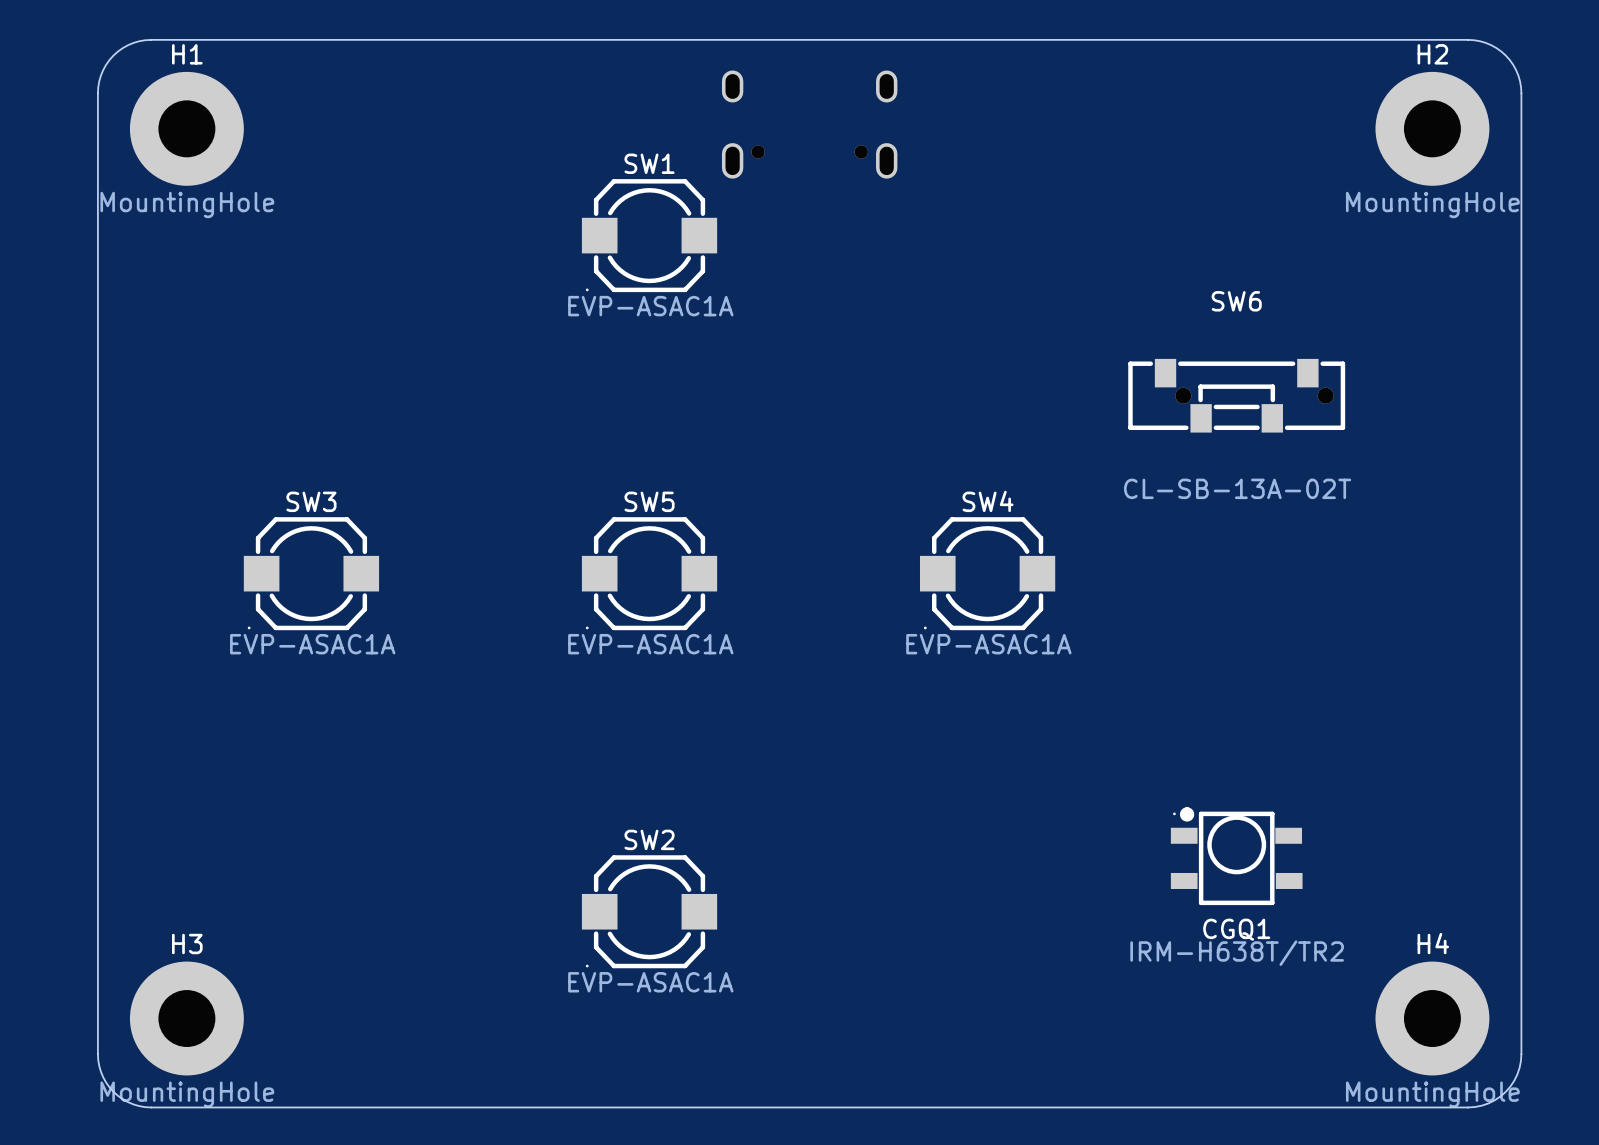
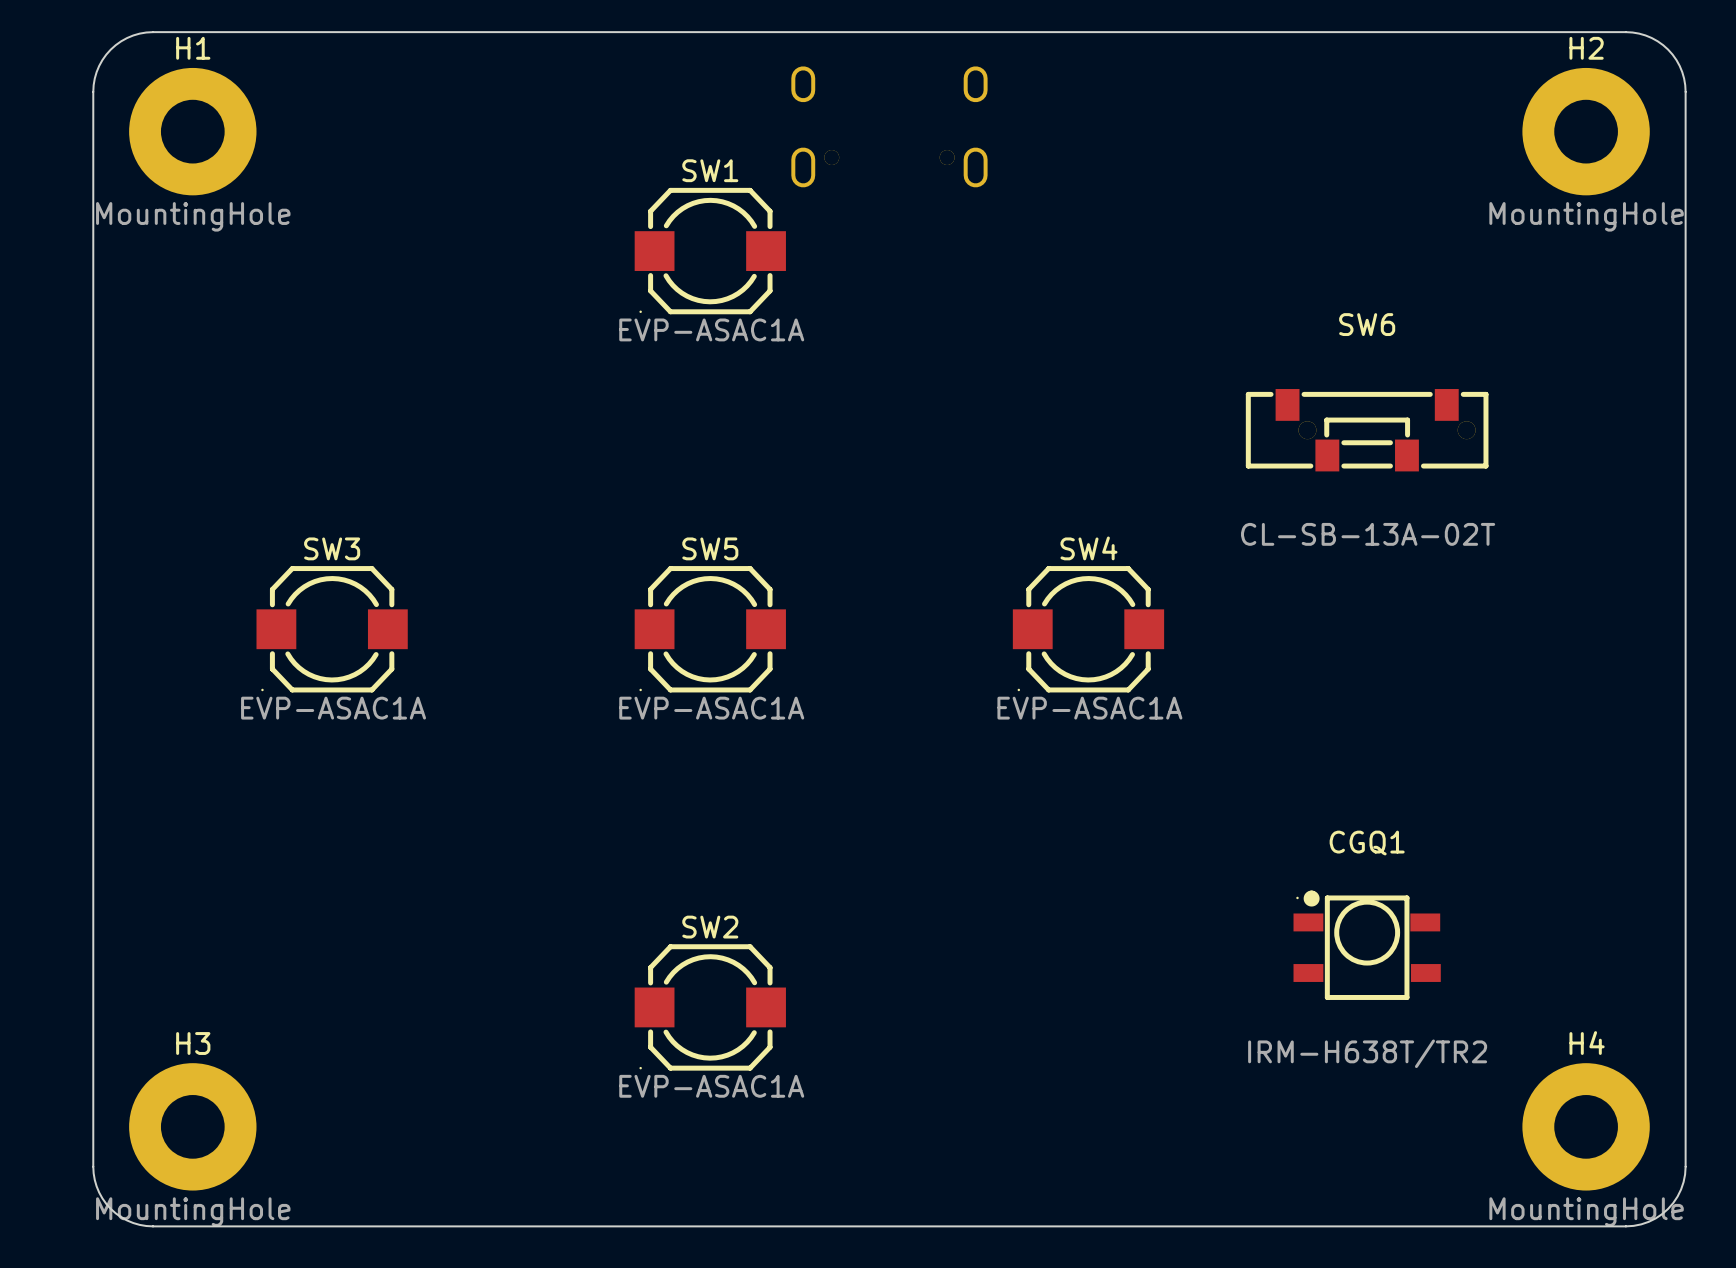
CGQ1 name position: CGQ1 (1236, 929) -> CGQ1 (1367, 843)

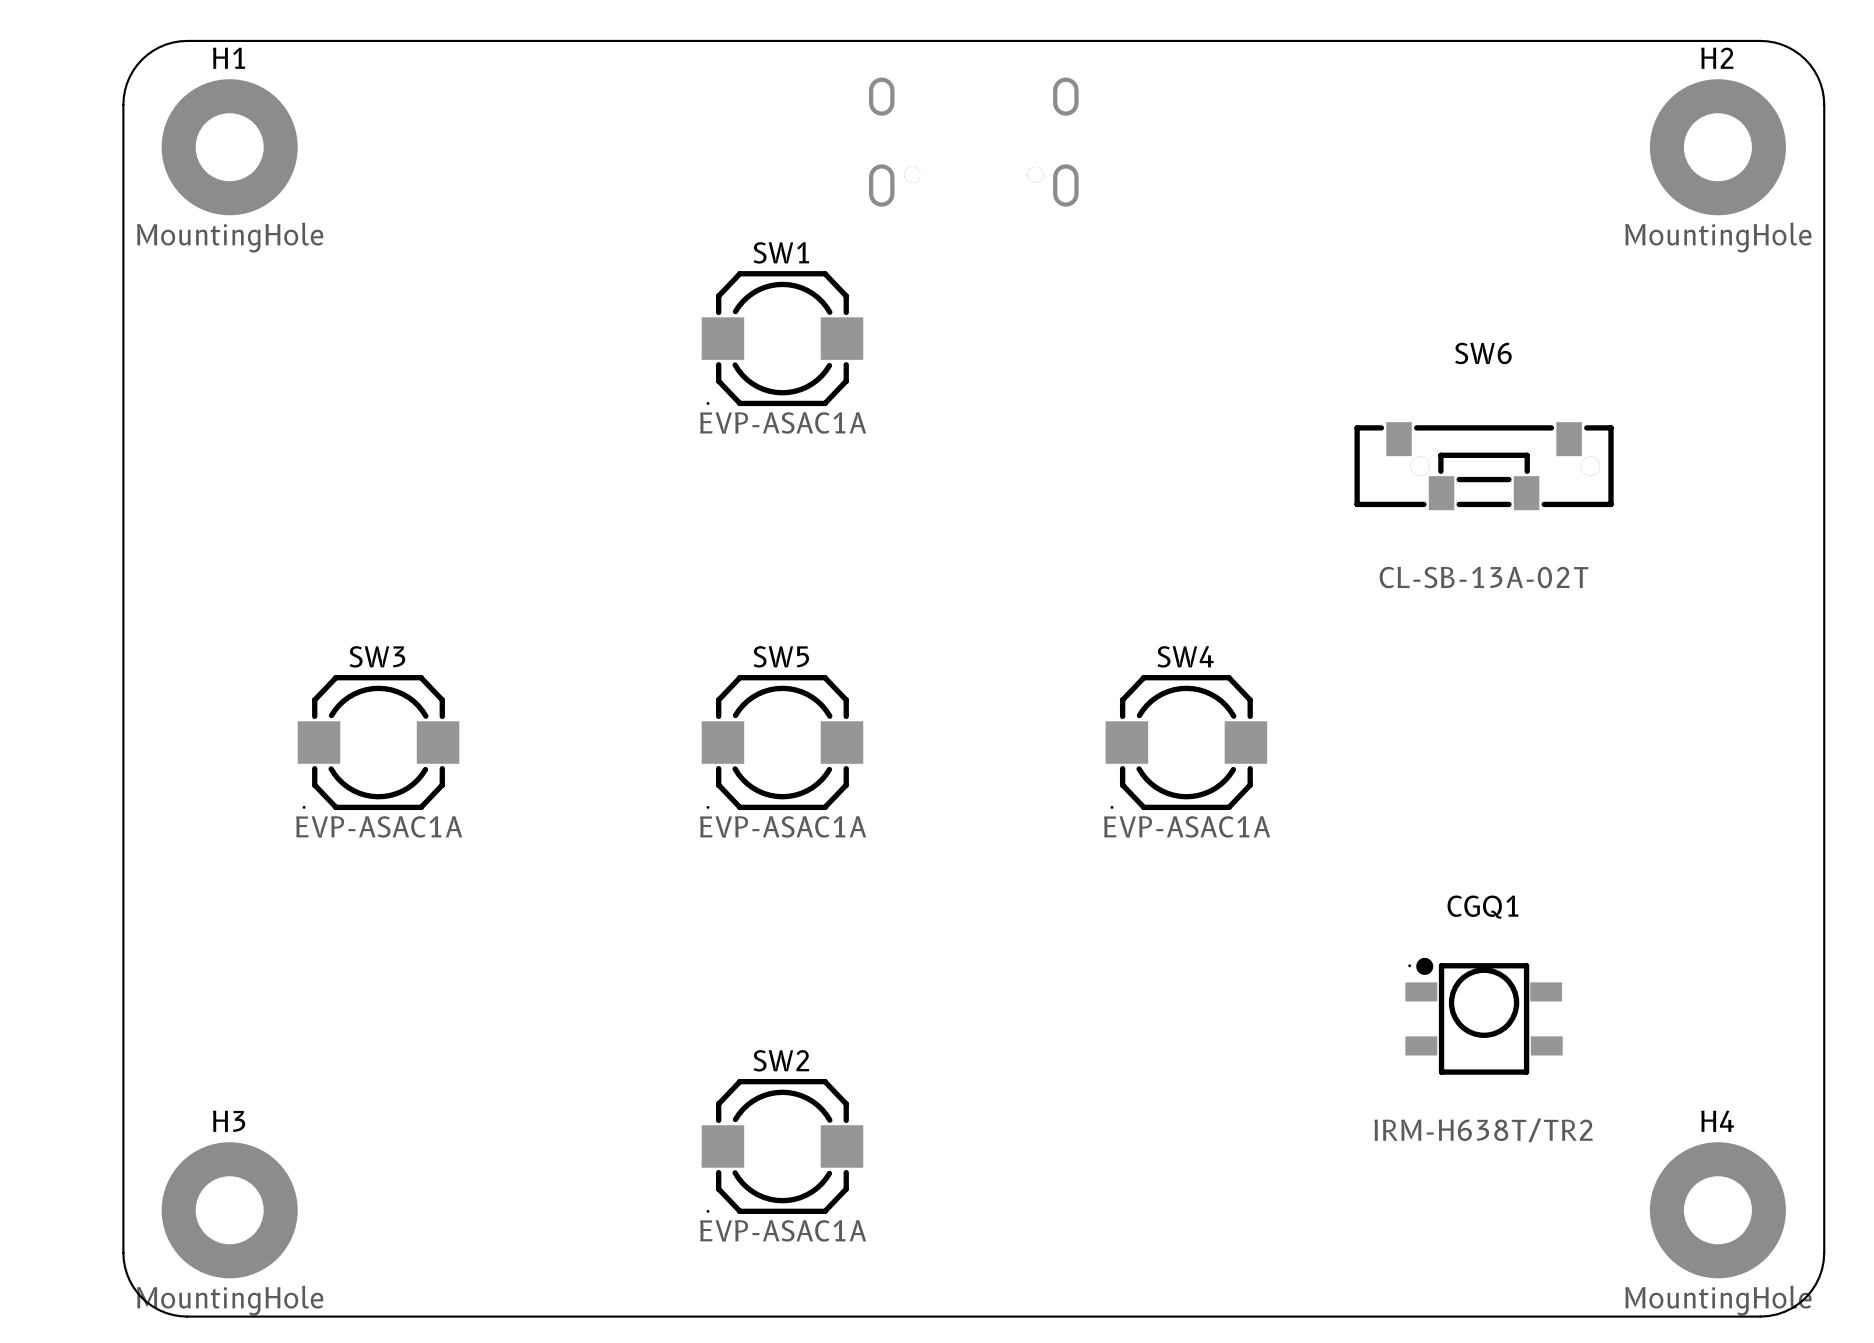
SW1 position: (710, 251) -> (782, 338)
SW3 position: (332, 629) -> (378, 742)
SW5 position: (710, 629) -> (782, 742)
SW4 position: (1088, 629) -> (1186, 742)
SW2 position: (710, 1007) -> (782, 1146)

